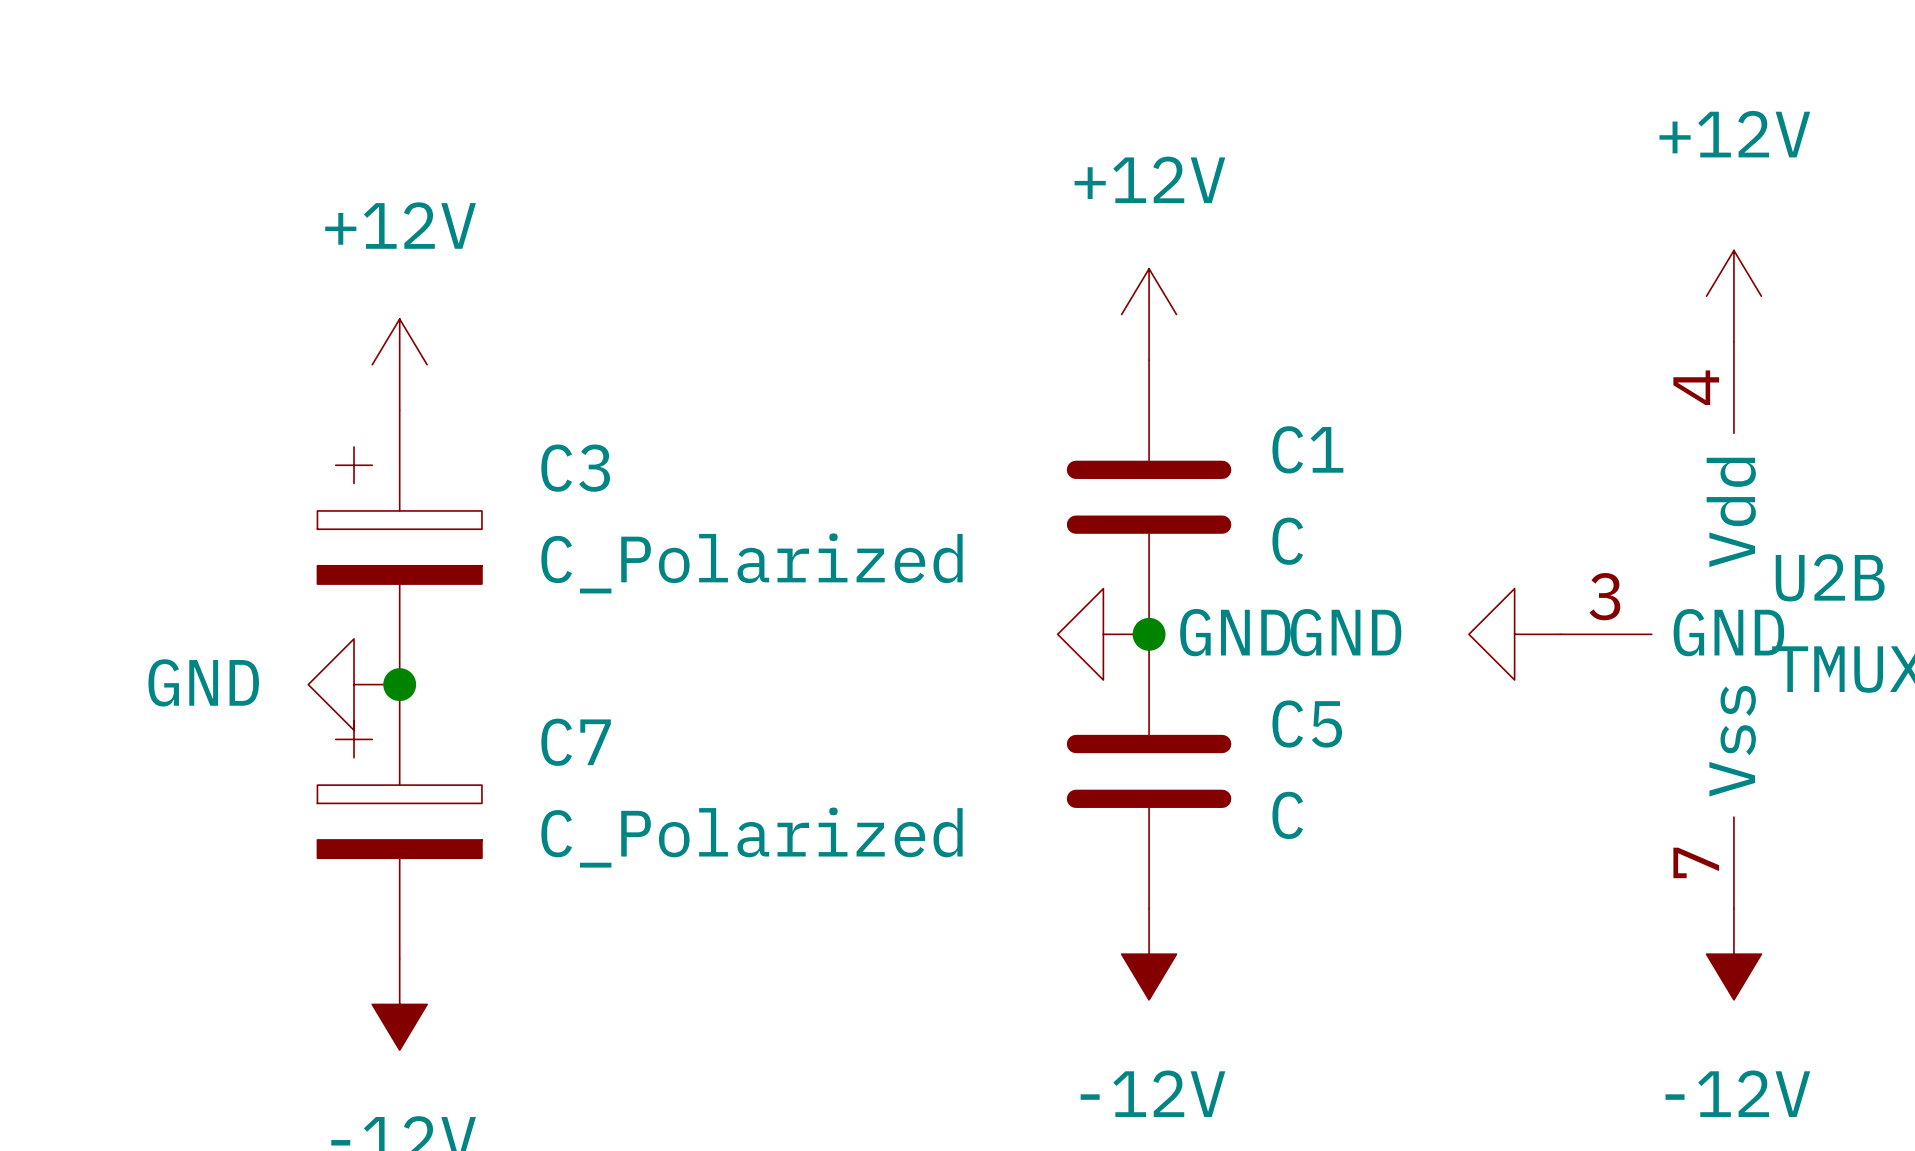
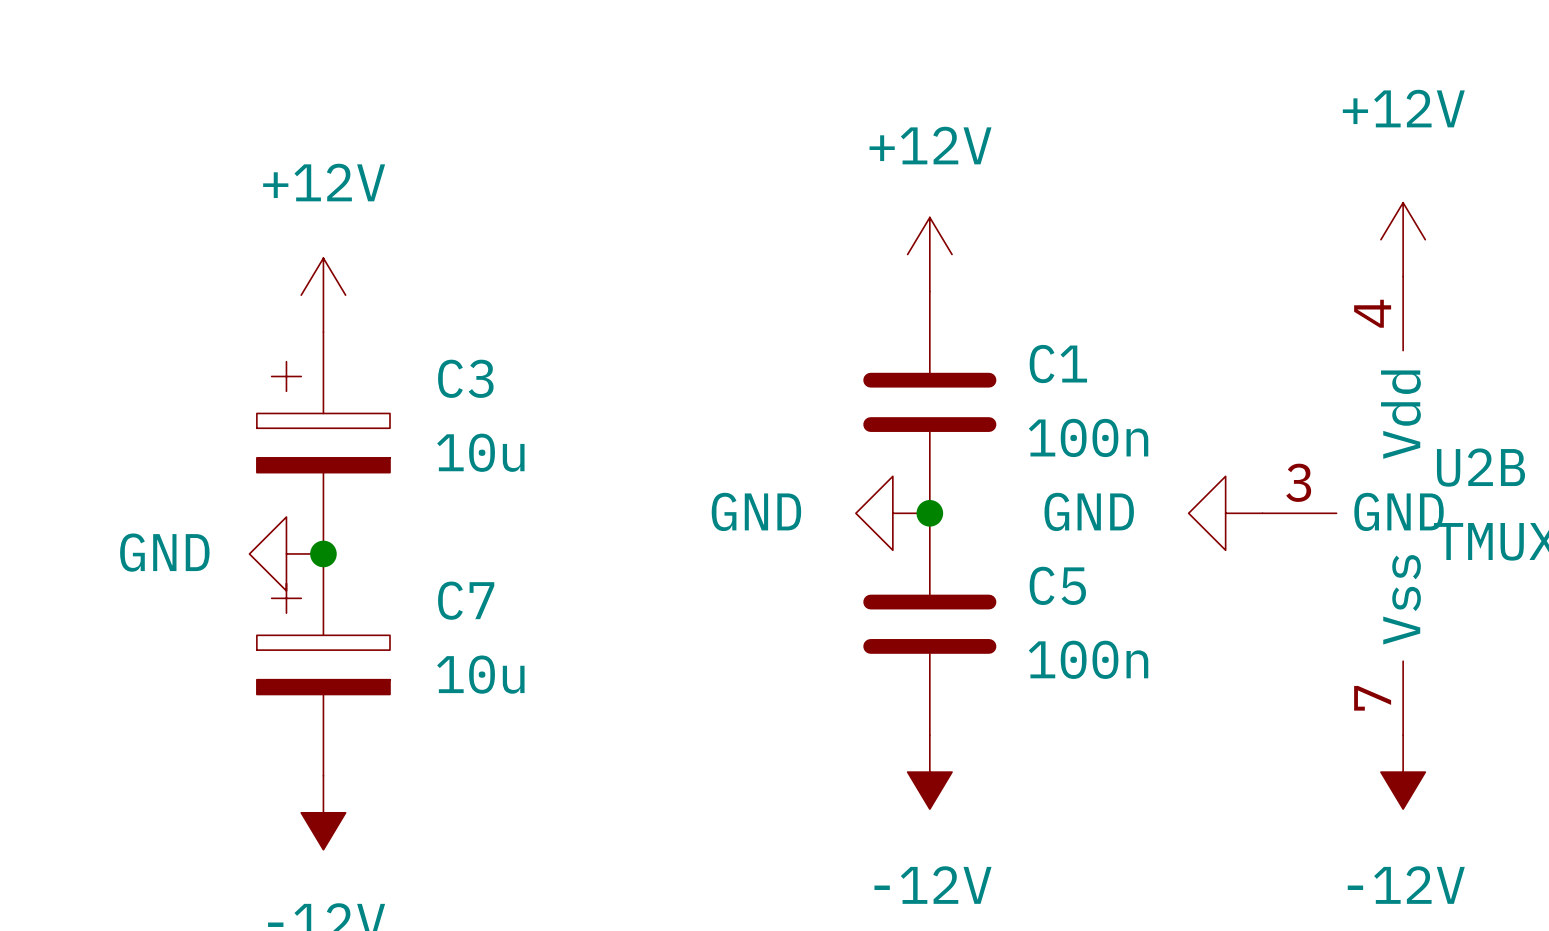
C1 value: C (1287, 541) -> 100n (1088, 437)
C3 value: C_Polarized (752, 563) -> 10u (480, 452)
power symbol text position: GND (1235, 632) -> GND (756, 511)
C5 value: C (1287, 815) -> 100n (1088, 659)
C7 value: C_Polarized (752, 837) -> 10u (480, 674)

